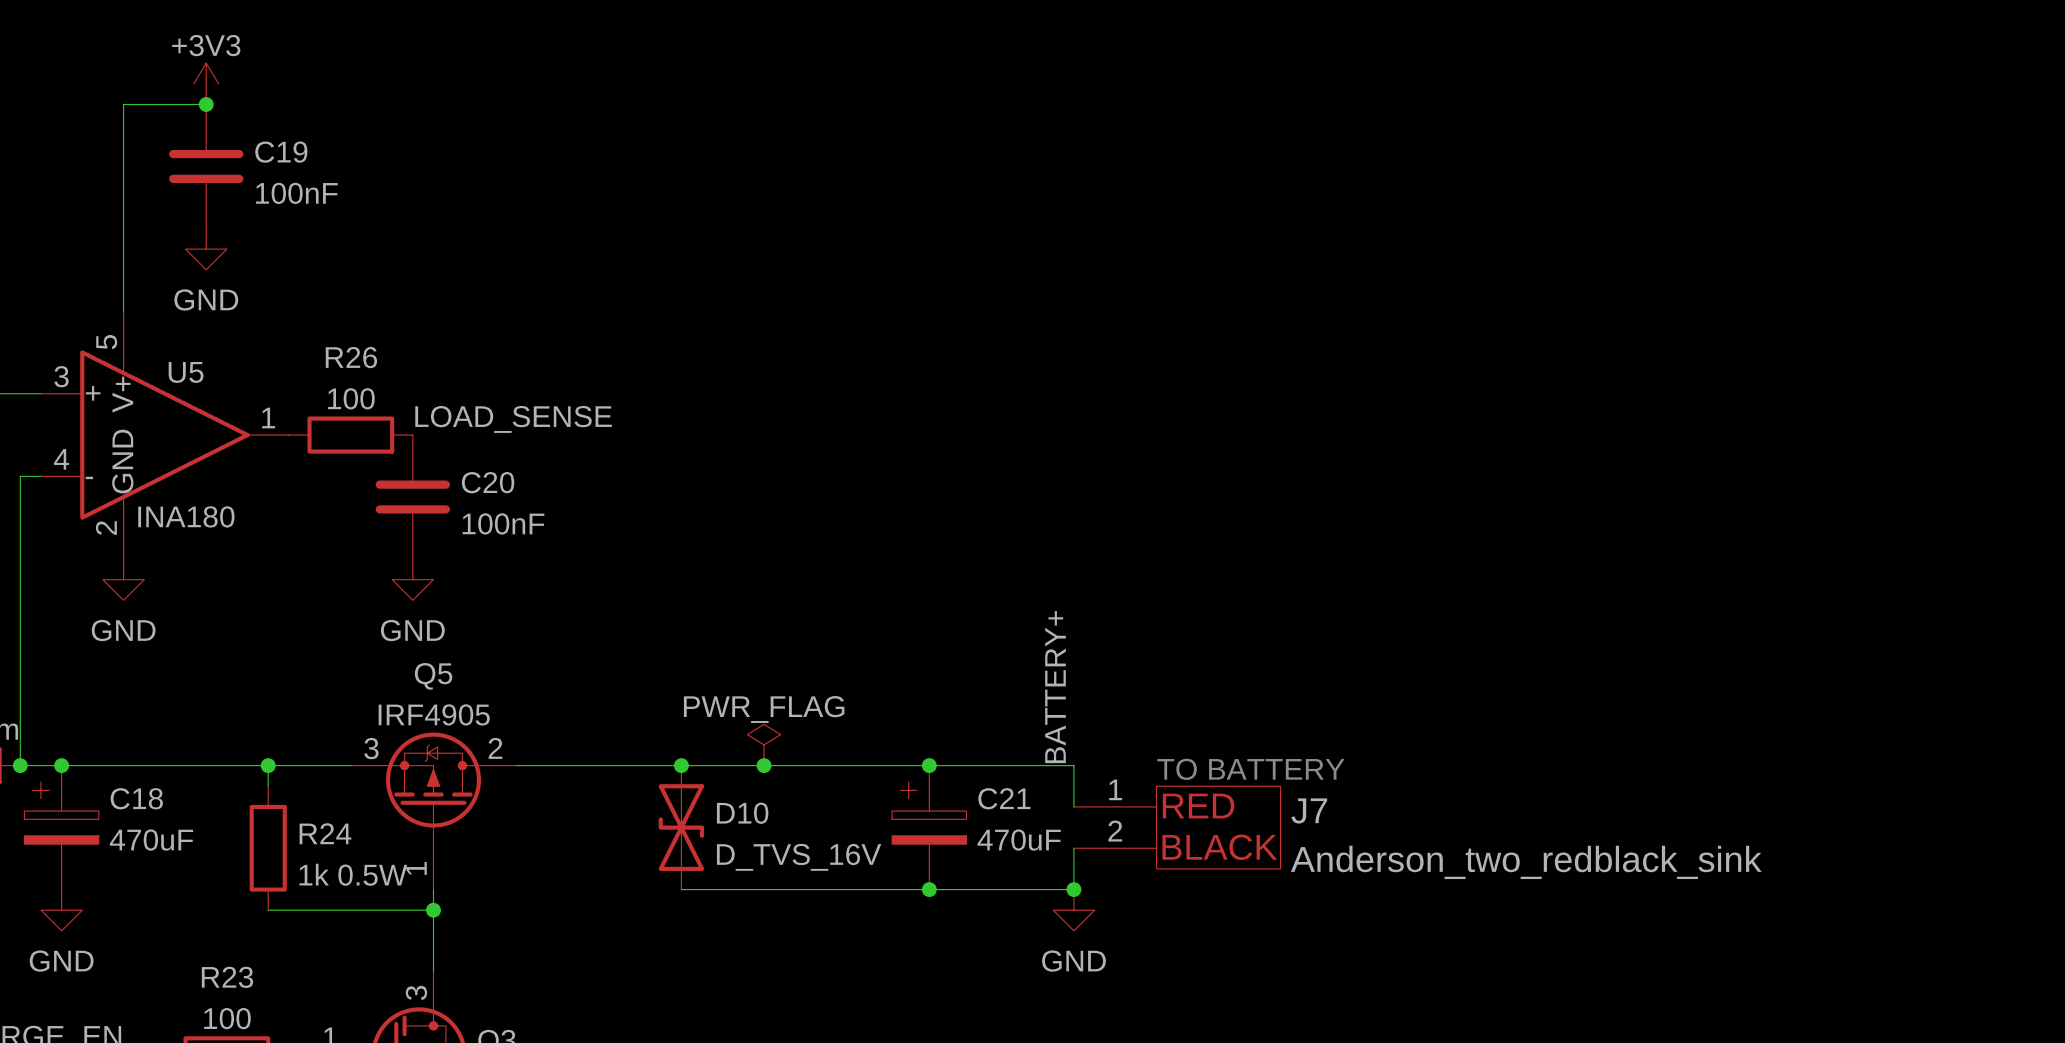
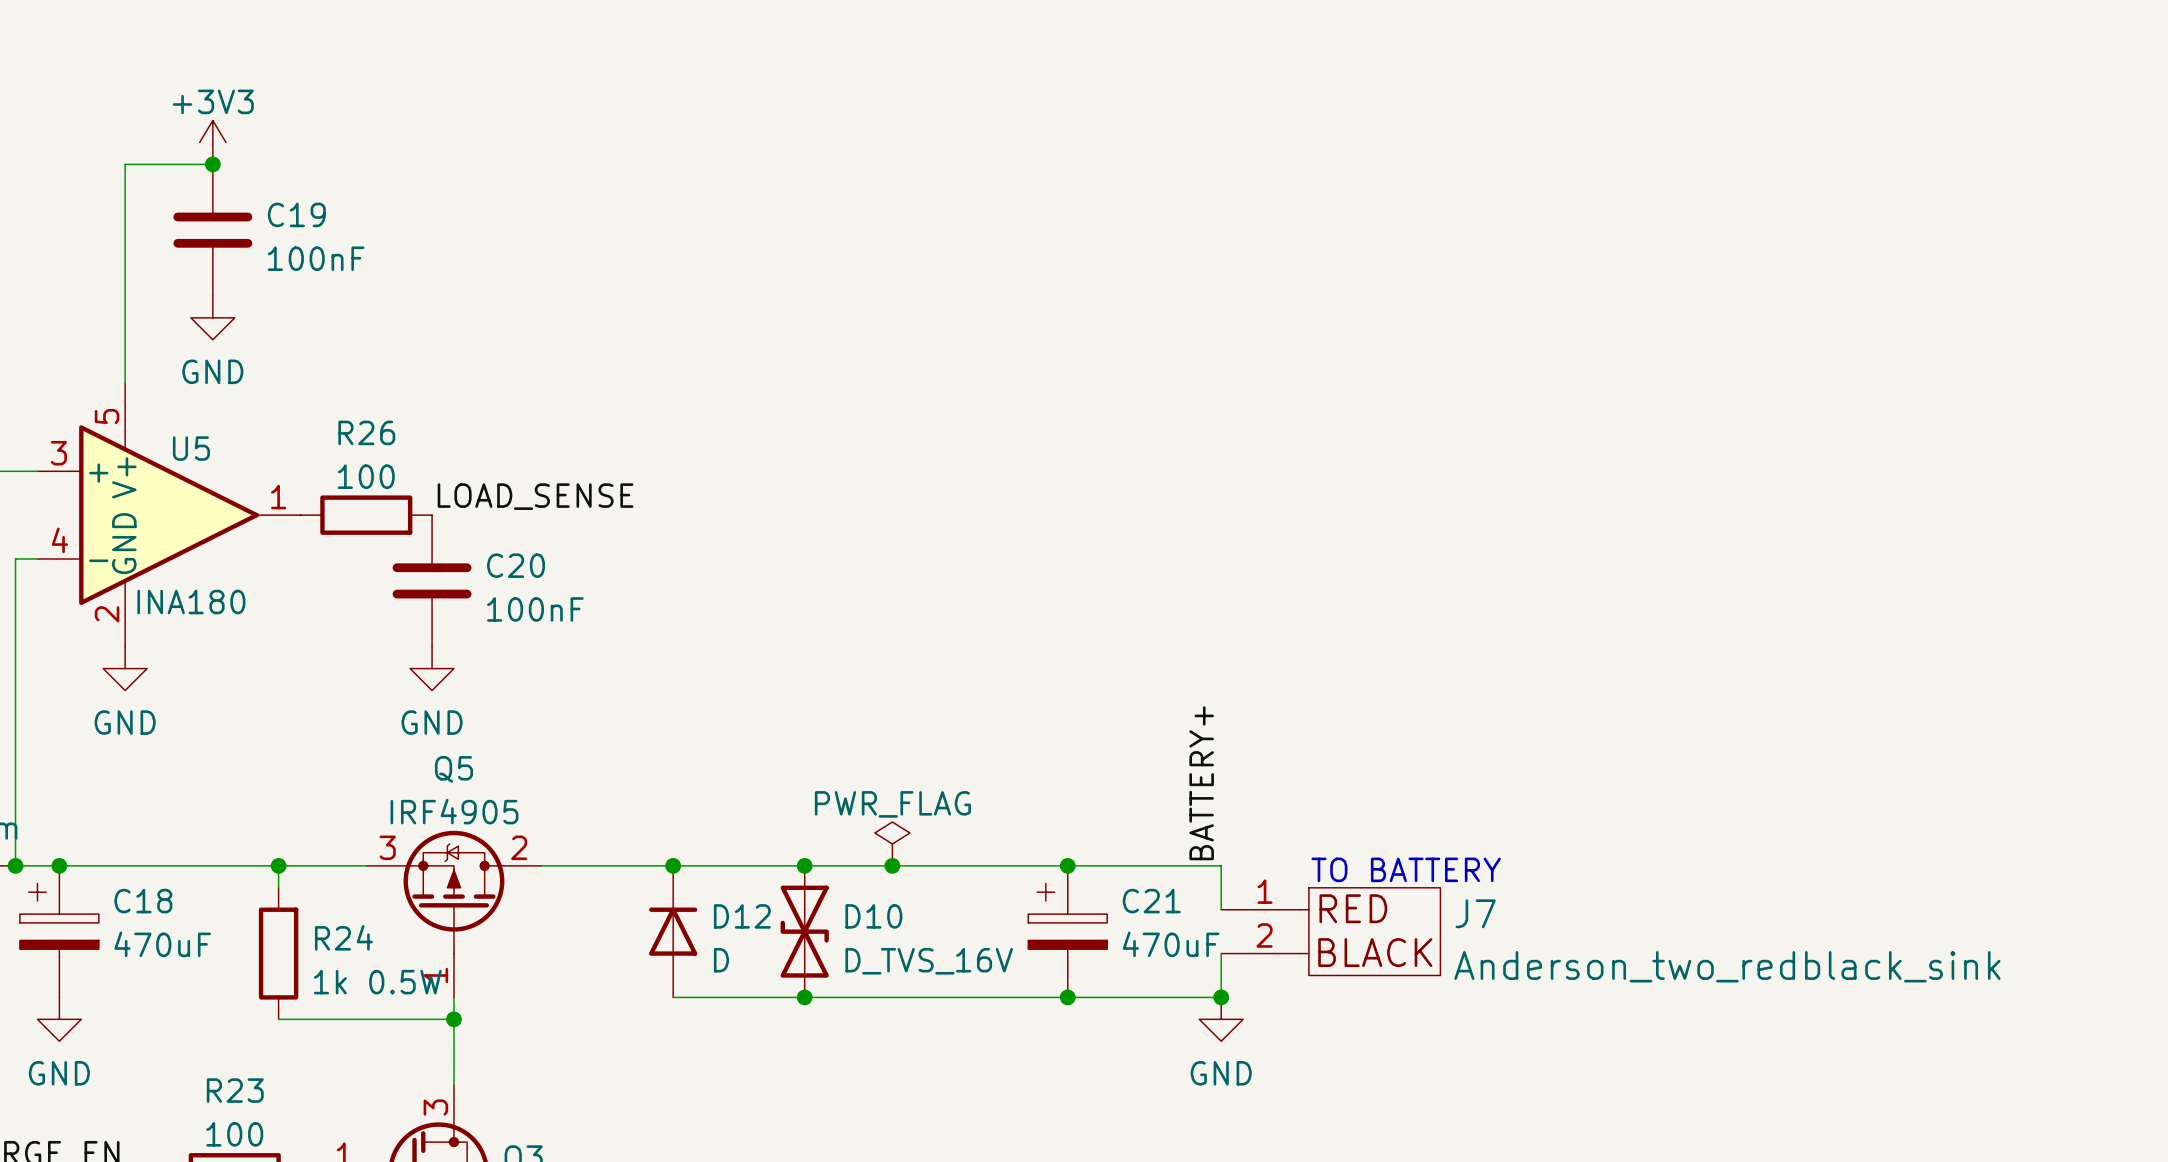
label position: BATTERY+ (1055, 687) -> BATTERY+ (1201, 783)
power symbol position: PWR_FLAG (764, 744) -> PWR_FLAG (892, 843)
junction position: (681, 765) -> (673, 865)
junction: none -> (892, 865)
junction: (929, 765) -> none
junction: none -> (1067, 865)
wire: (1073, 765) (1073, 806) -> (1133, 865) (1221, 865) (1221, 909)
text position: TO BATTERY (1250, 769) -> TO BATTERY (1406, 869)
D12: none -> D (673, 931)
D10 position: (681, 827) -> (804, 931)
C21 position: (929, 827) -> (1067, 931)
J7 position: (1177, 827) -> (1330, 931)
wire: (1073, 848) (1073, 889) -> (1221, 953) (1221, 997) (1133, 997)
wire: none -> (673, 997) (717, 997)
junction: none -> (804, 997)
junction: (929, 889) -> none
junction: none -> (1067, 997)
junction: (1073, 889) -> none
junction: none -> (1221, 997)
power symbol position: GND (1073, 910) -> GND (1221, 1019)

